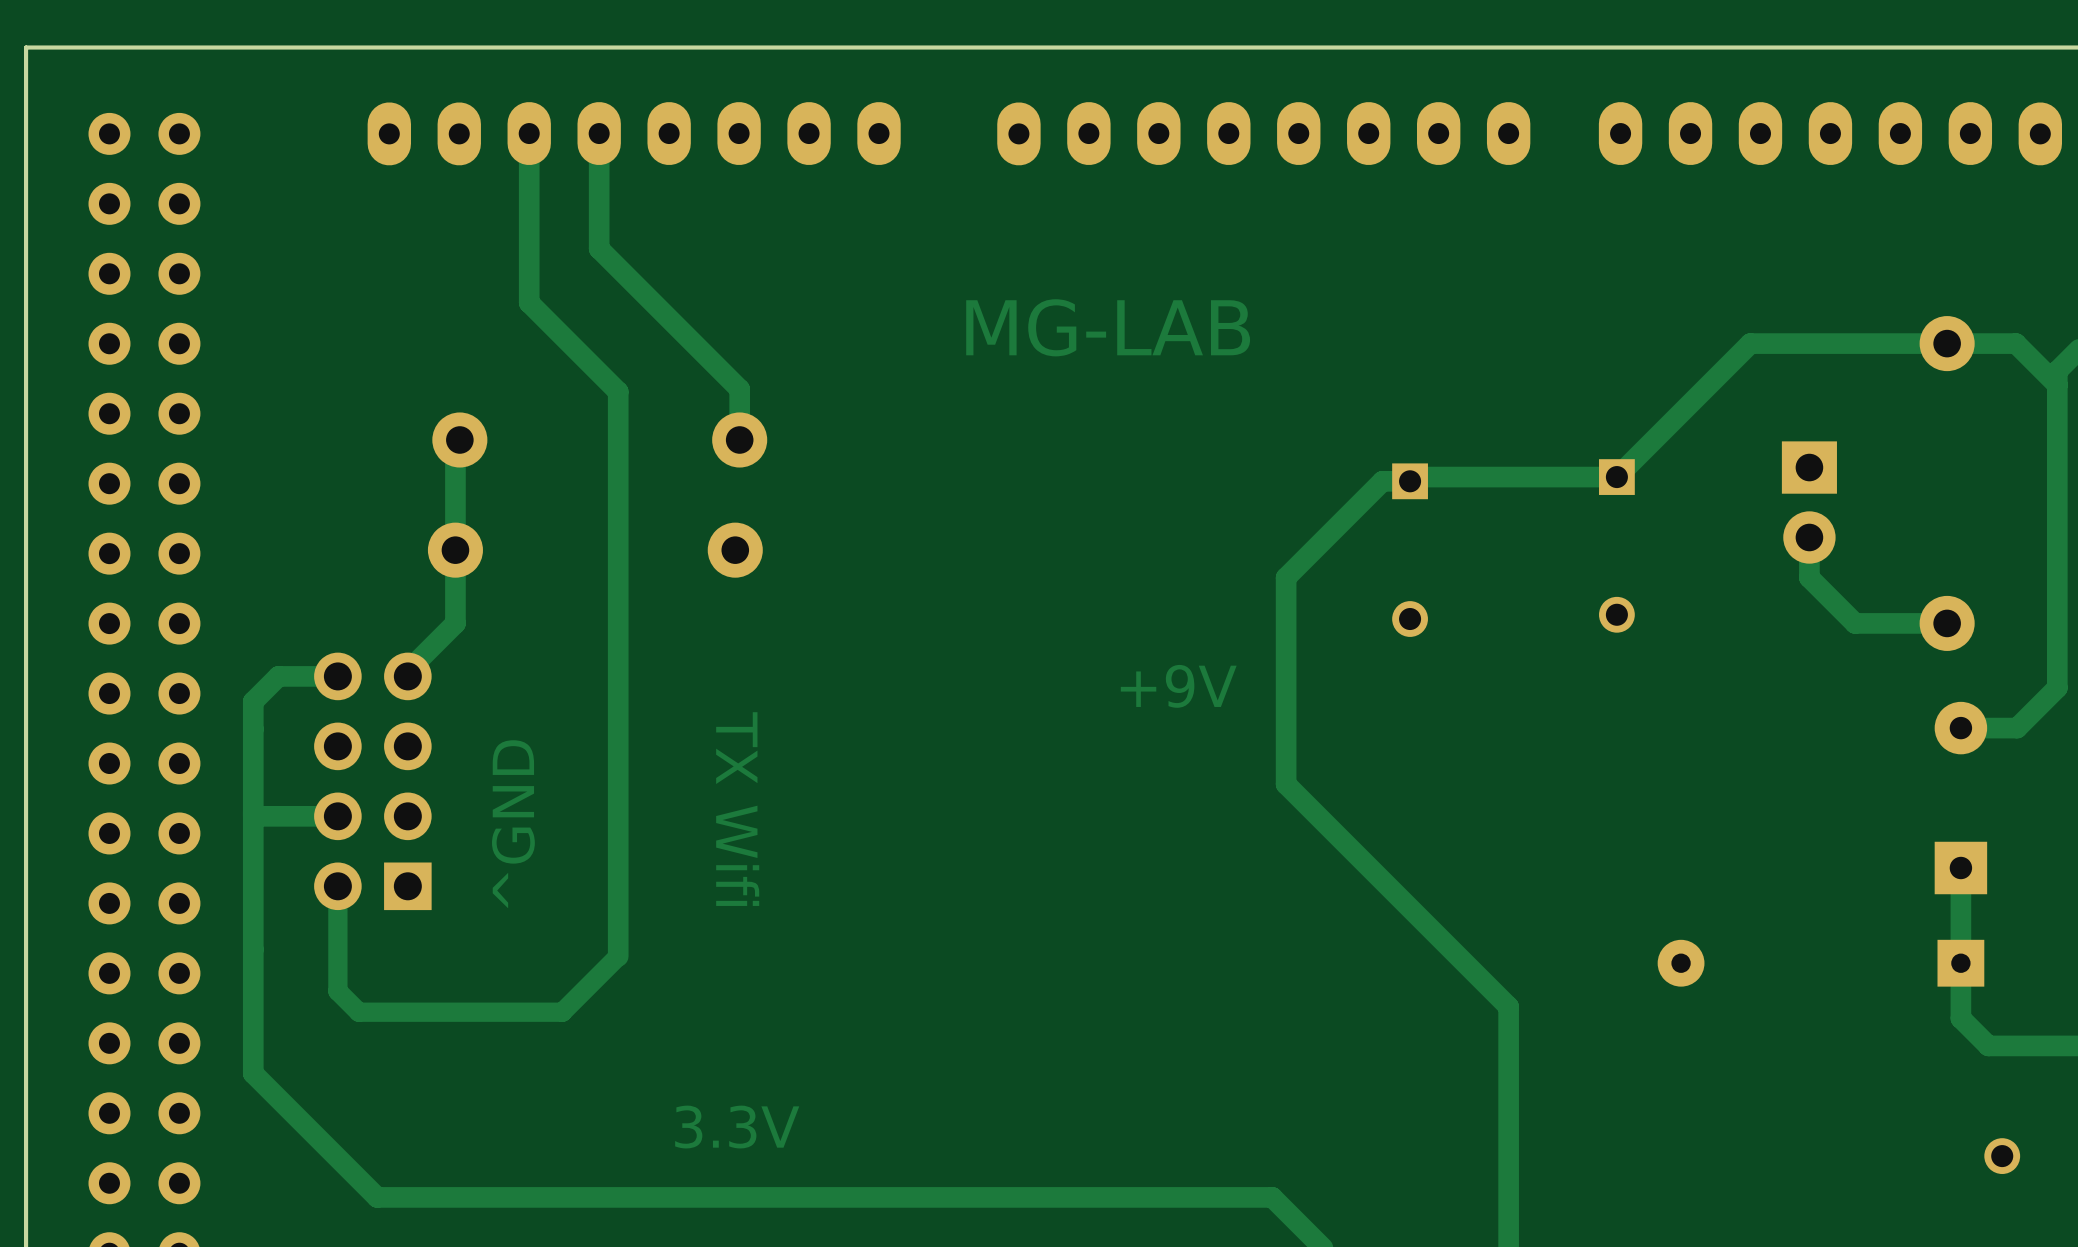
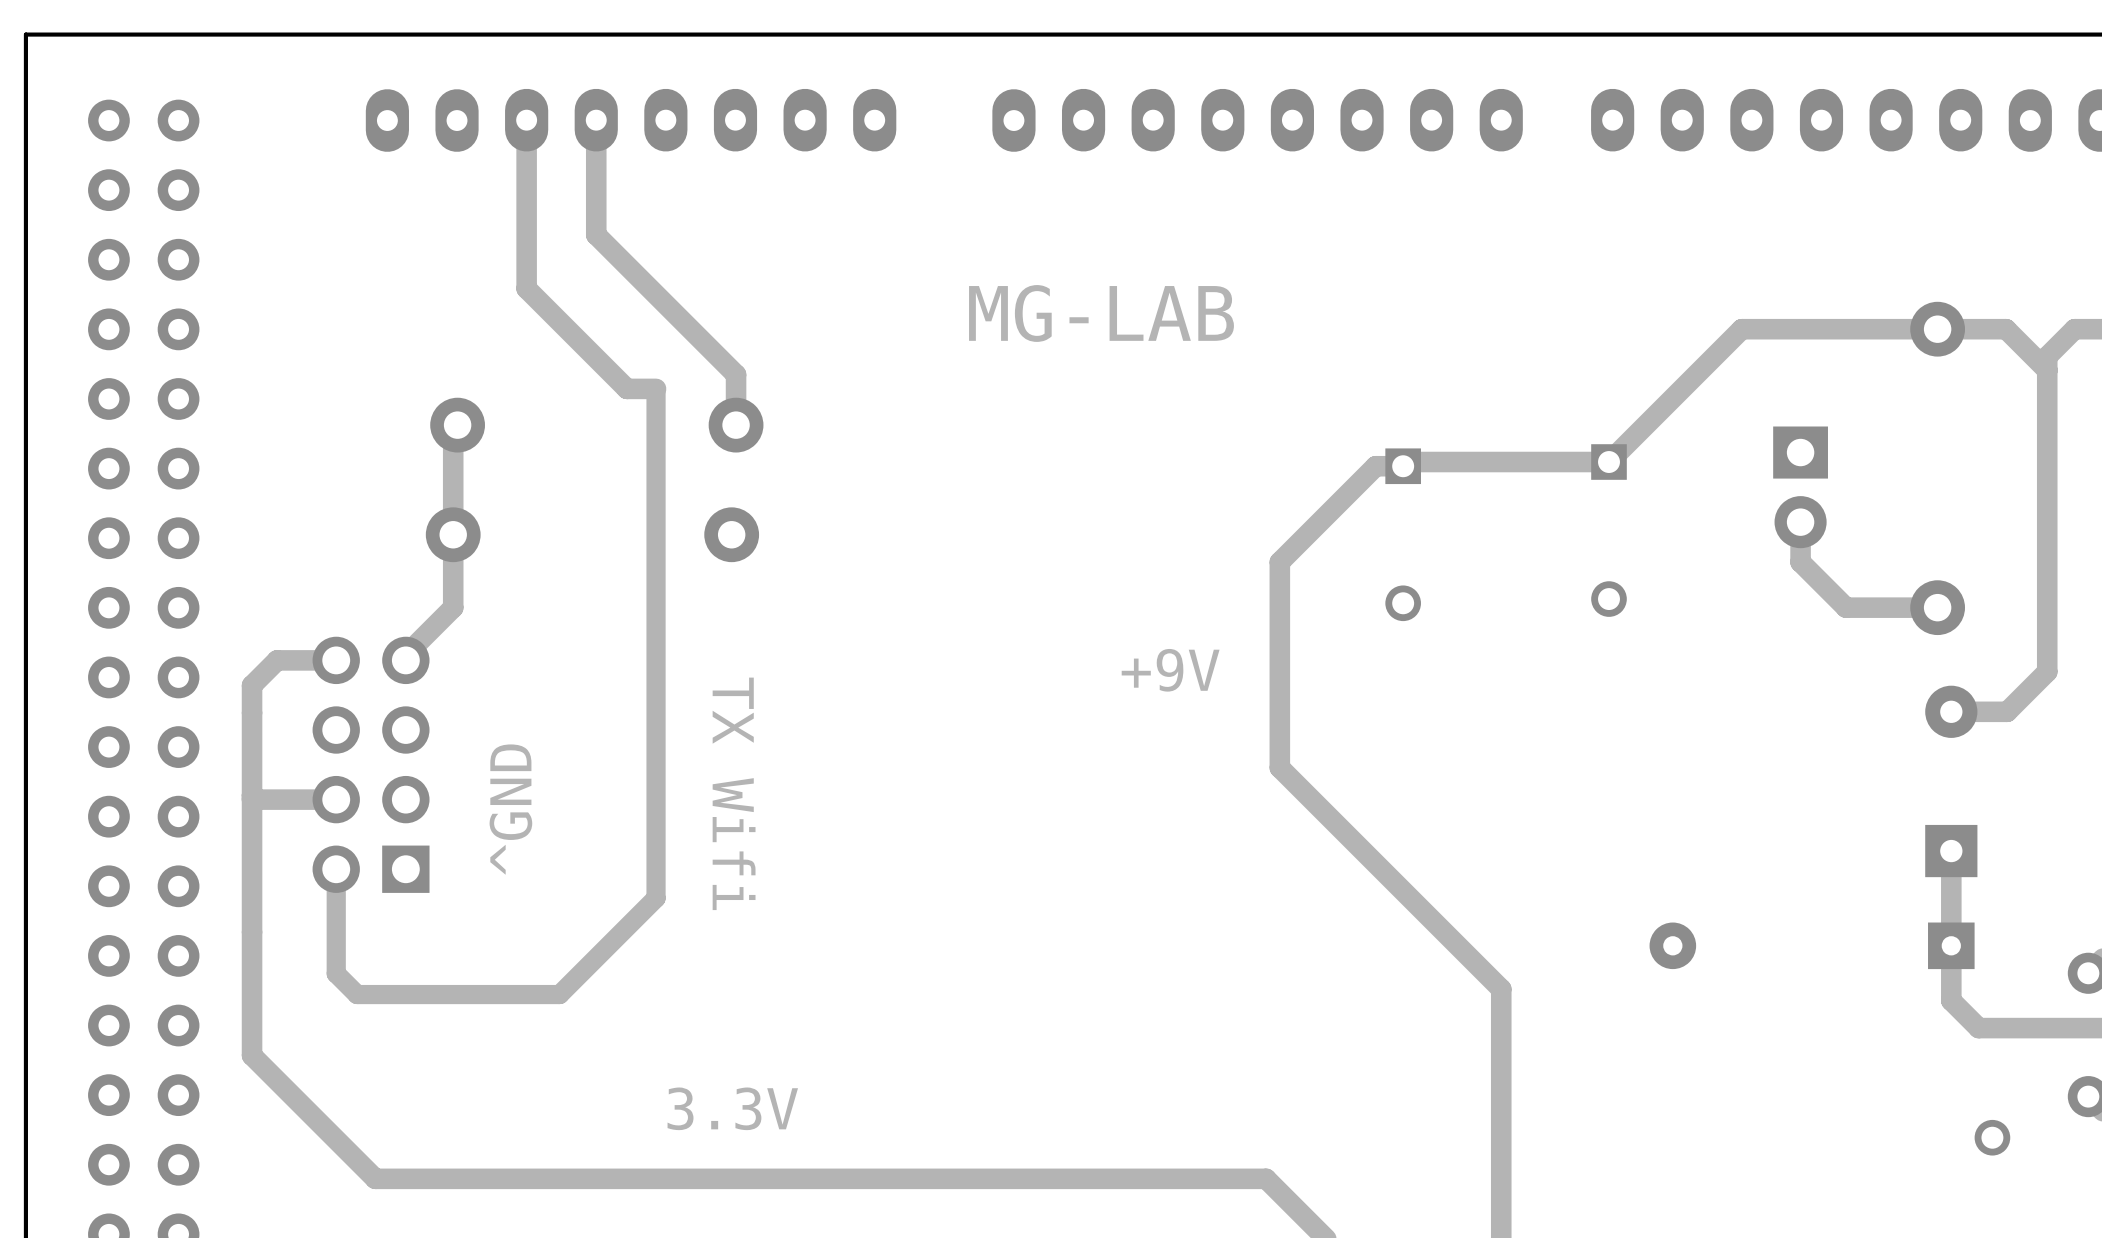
track: (618, 391) (618, 956) -> (615, 377) (626, 388) (656, 388) (656, 898) (615, 939)

